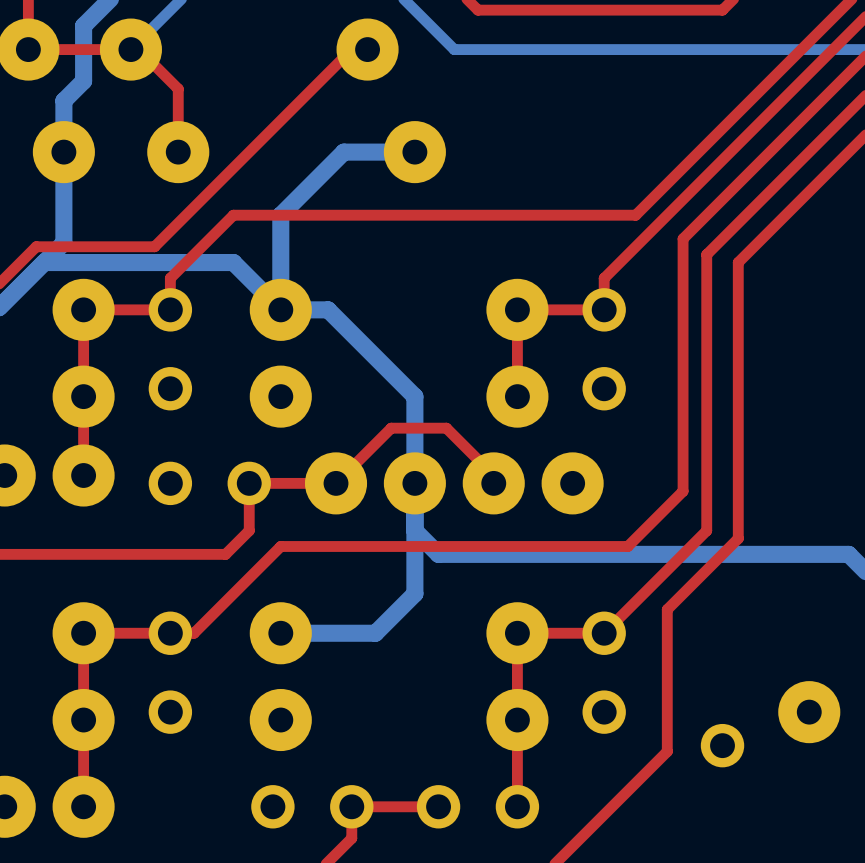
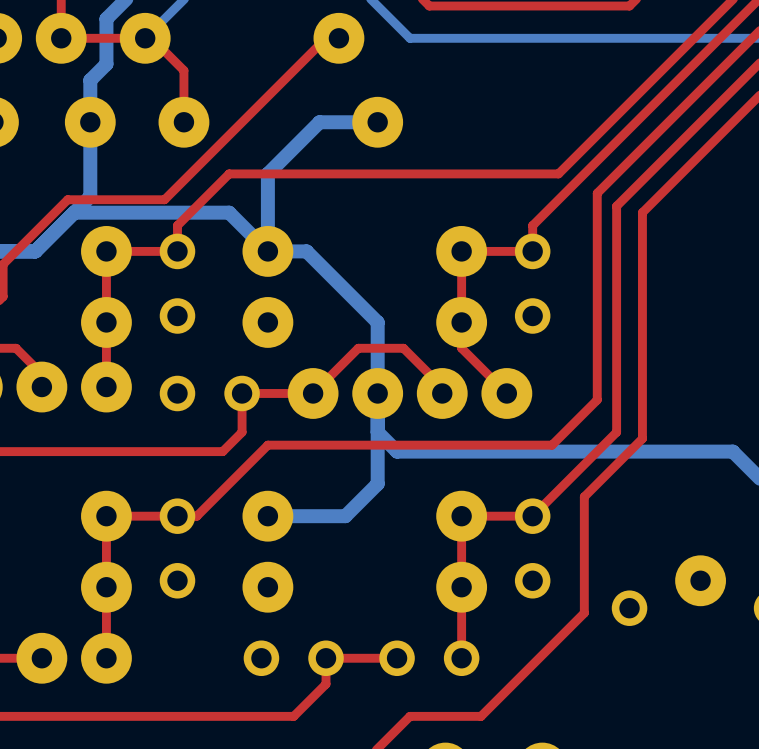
top track: none -> (461, 322) (461, 348) (506, 393)

